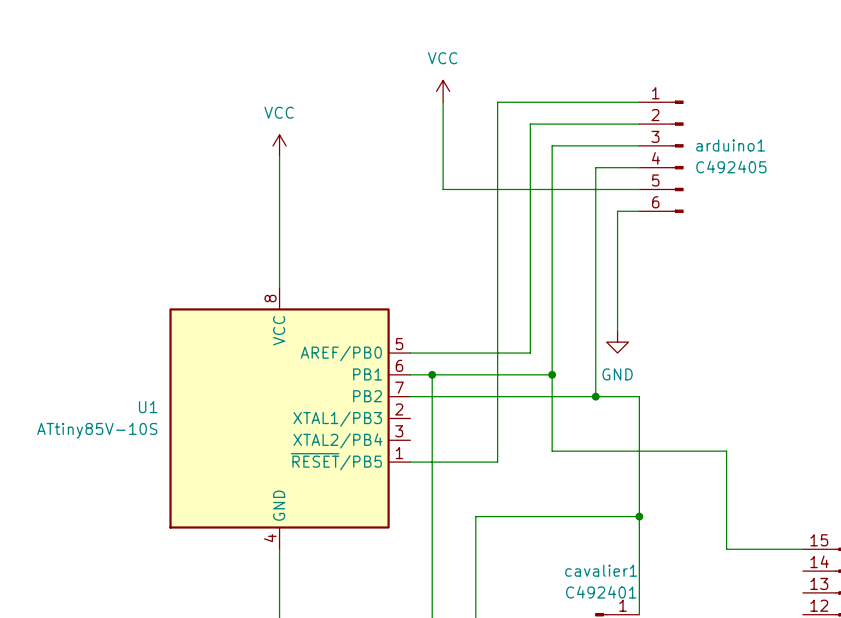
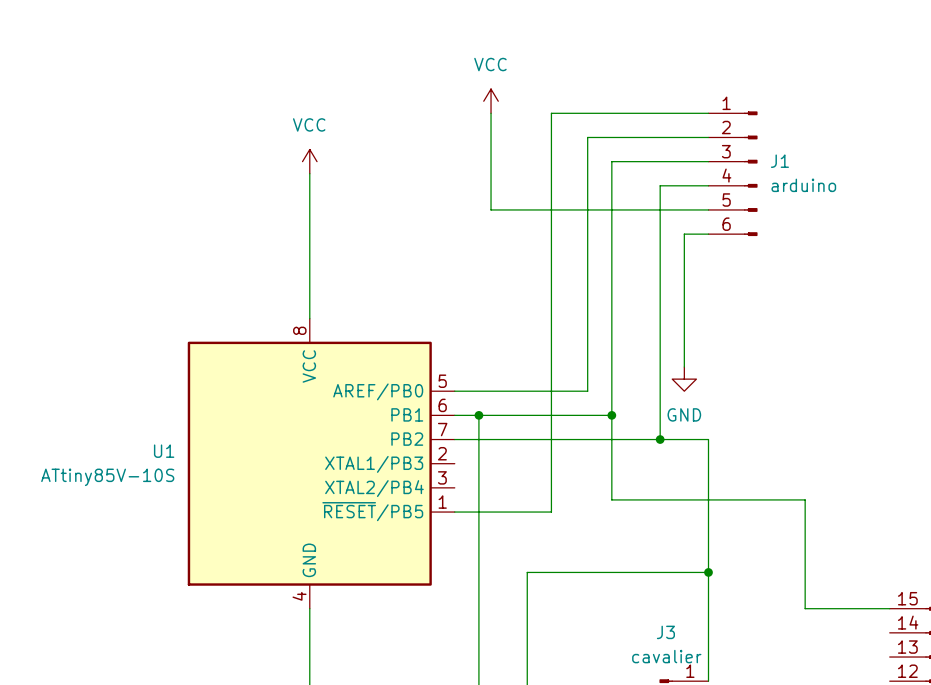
arduino1 name: arduino1 (730, 145) -> J1 (779, 161)
arduino1 value: C492405 (731, 167) -> arduino (803, 185)
cavalier1 name: cavalier1 (601, 570) -> J3 (665, 632)
cavalier1 value: C492401 (601, 592) -> cavalier (666, 656)

